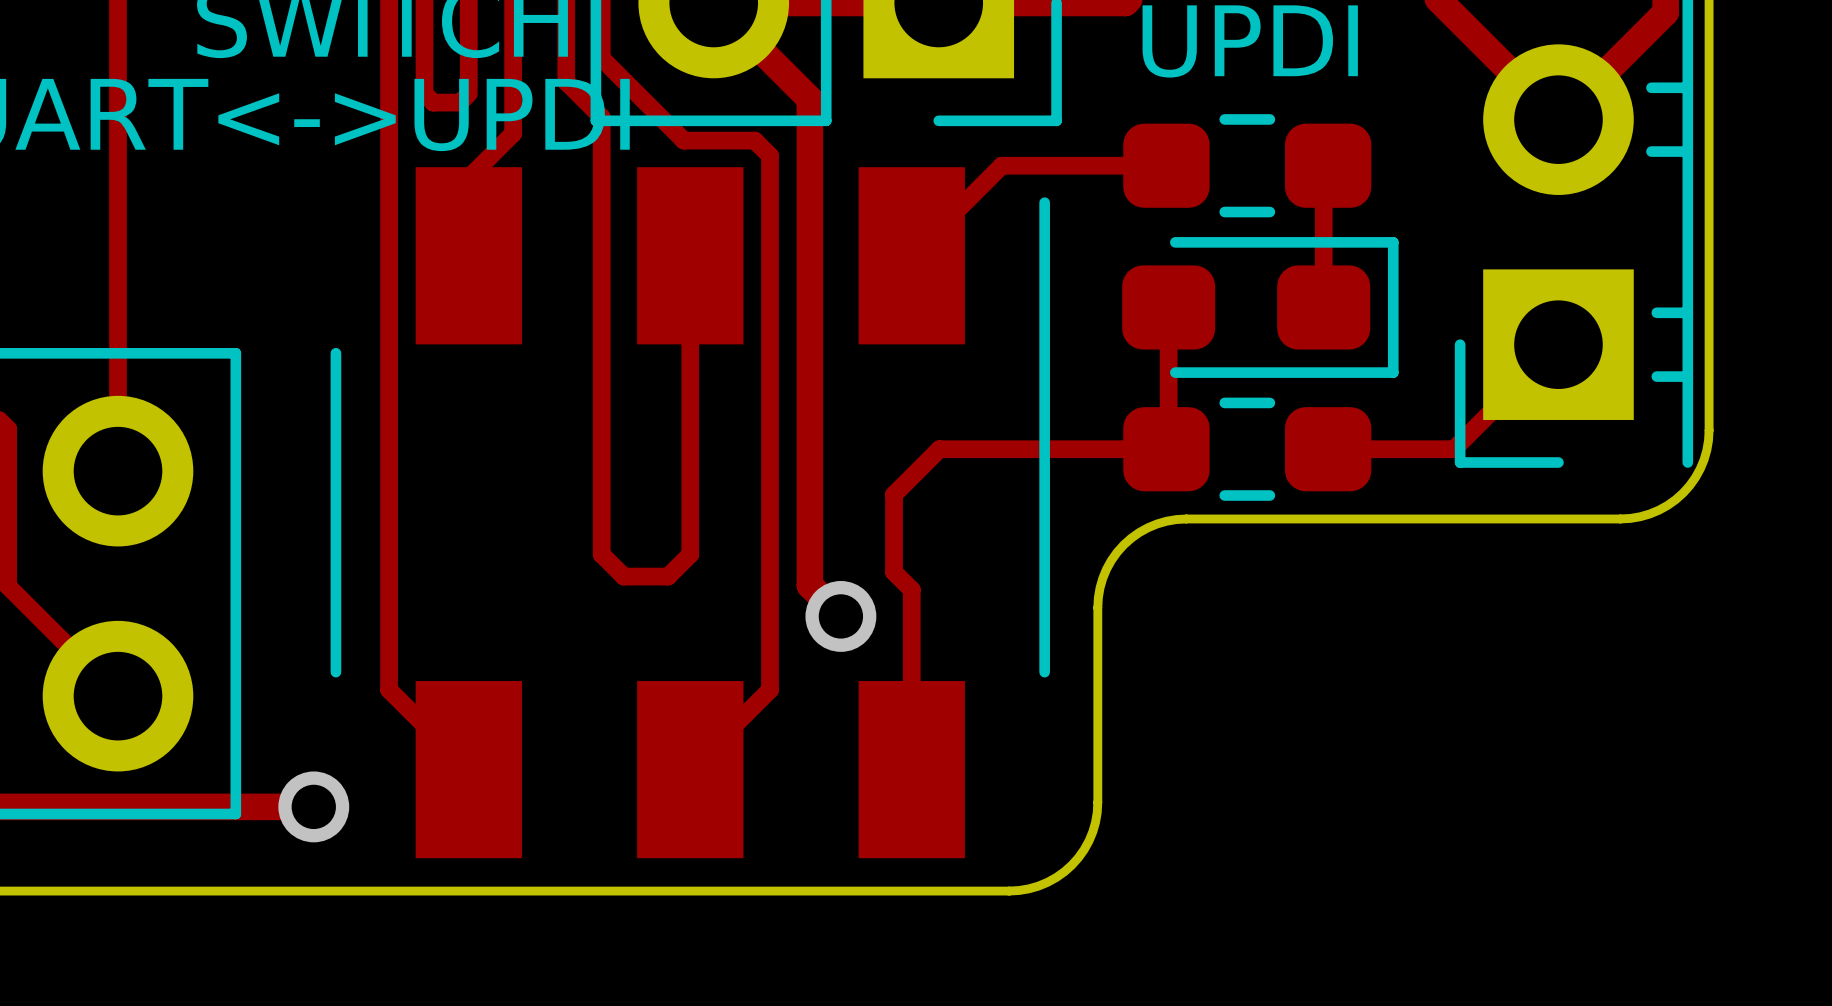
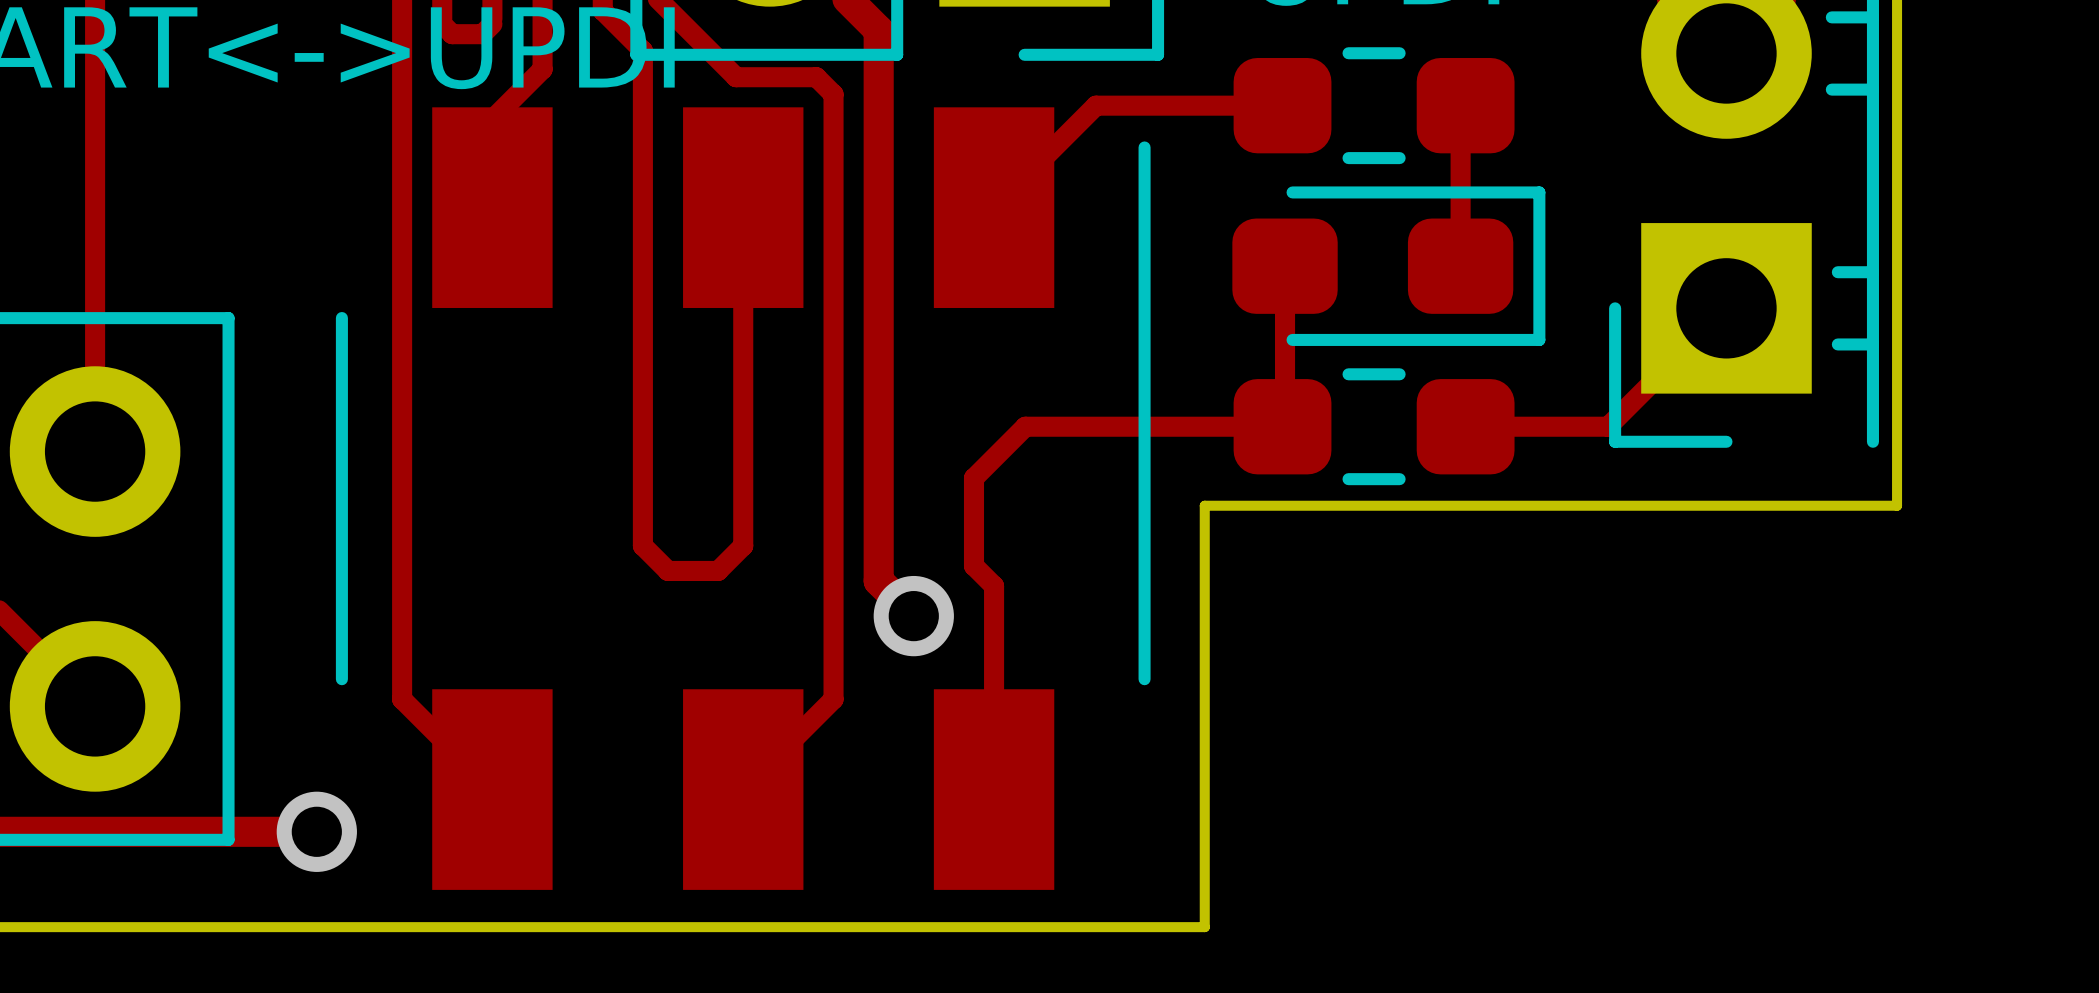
board edge: (1709, 430) (1706, 450) (1700, 468) (1683, 493) (1667, 505) (1649, 514) (1620, 518) -> (1897, 405) (1897, 505) (1796, 505)
board edge: (1186, 518) (1157, 523) (1139, 532) (1123, 544) (1111, 560) (1102, 578) (1097, 607) -> (1305, 505) (1204, 505) (1204, 606)
board edge: (1097, 802) (1092, 831) (1084, 849) (1071, 865) (1047, 882) (1028, 888) (1009, 891) -> (1204, 826) (1204, 927) (1104, 927)

